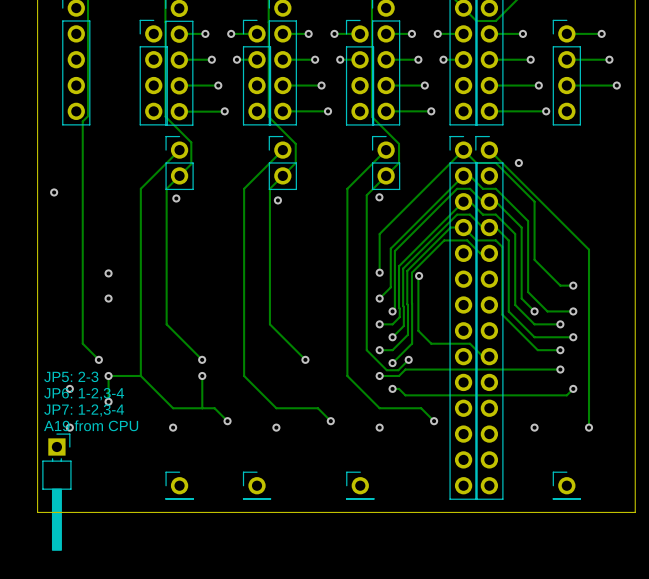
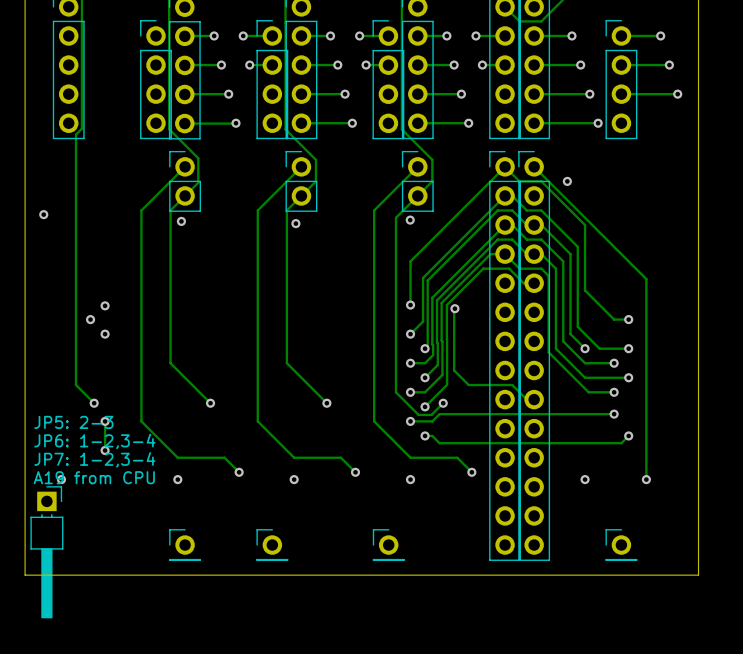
via: none -> (90, 319)
track: (140, 375) (108, 375) -> none
track: (202, 375) (202, 408) -> none
via: (202, 375) -> none
via: (69, 388) -> none

